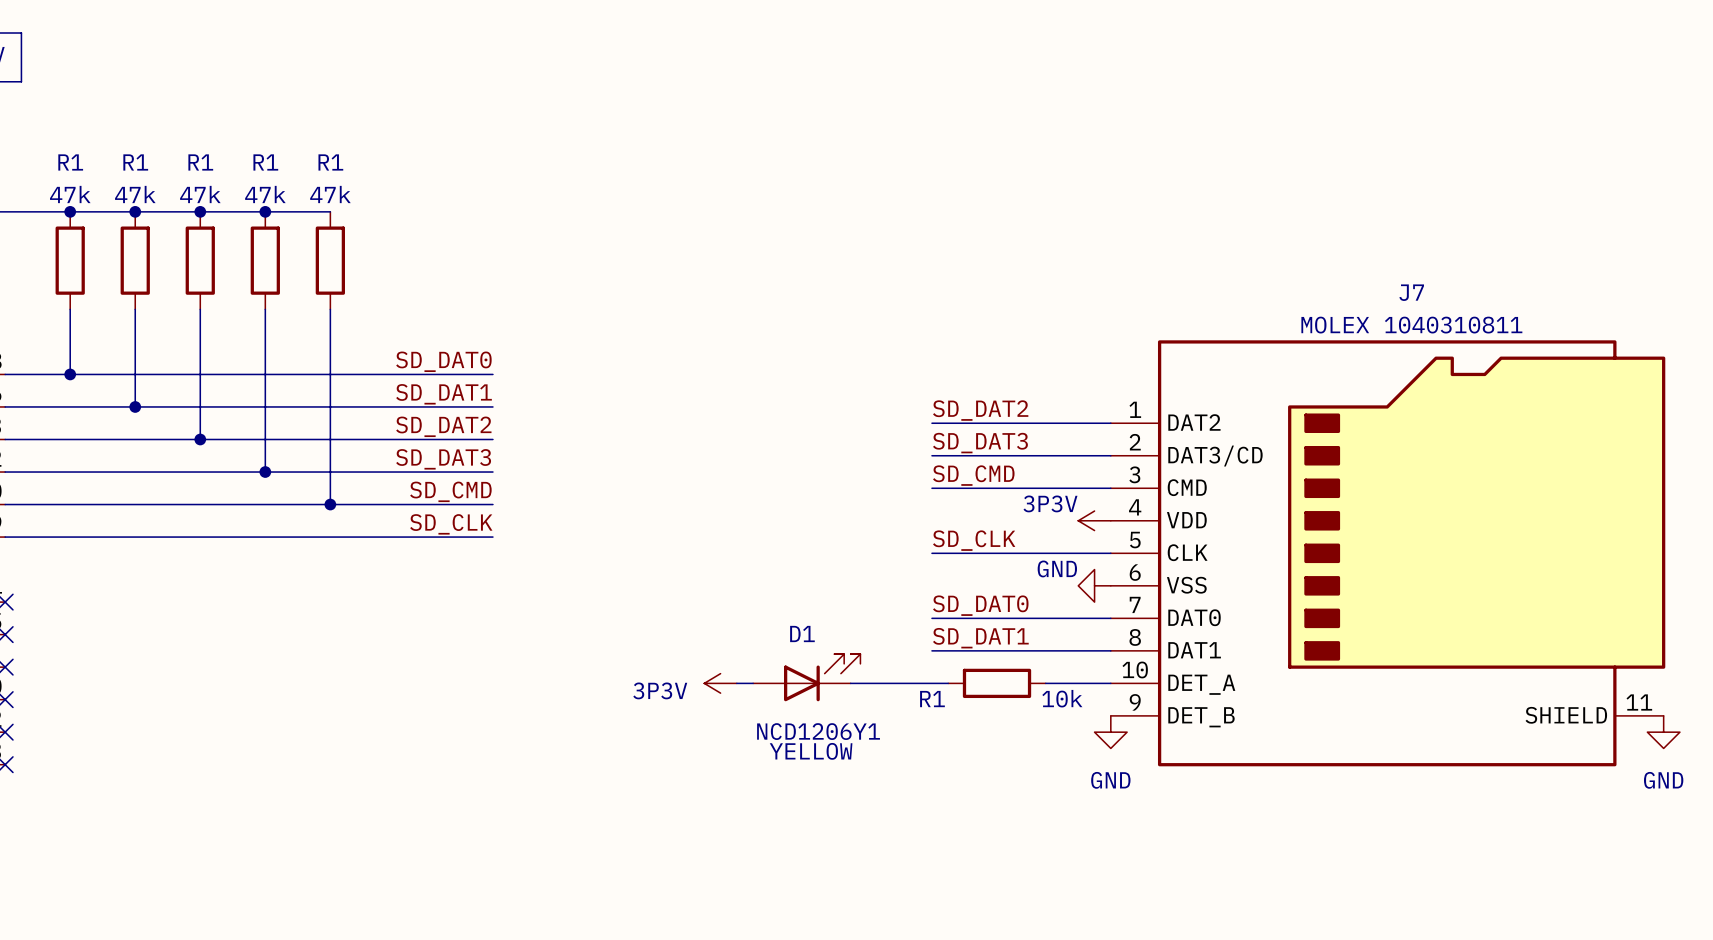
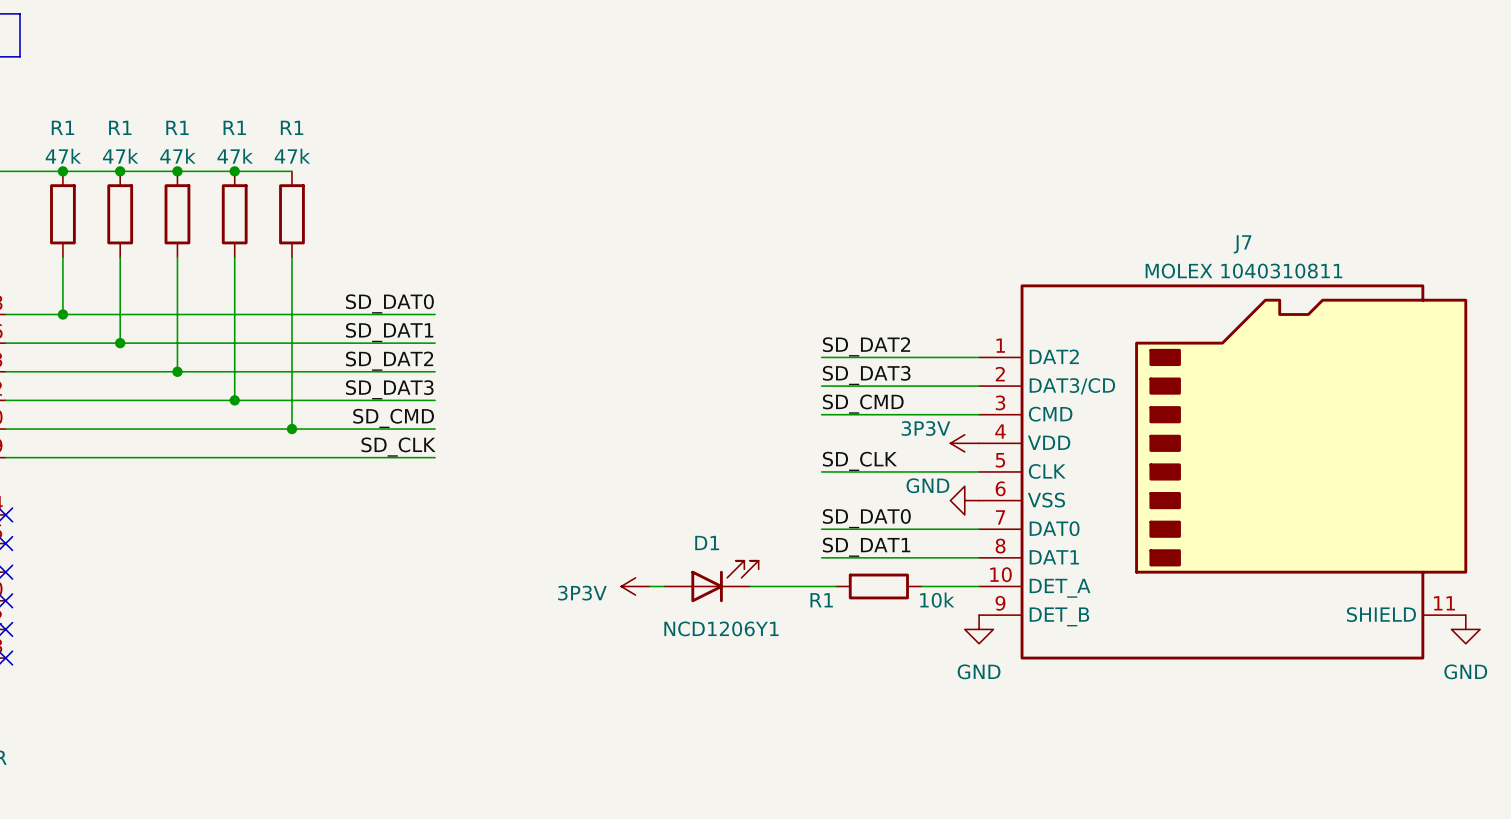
text: YELLOW (811, 751) -> none

